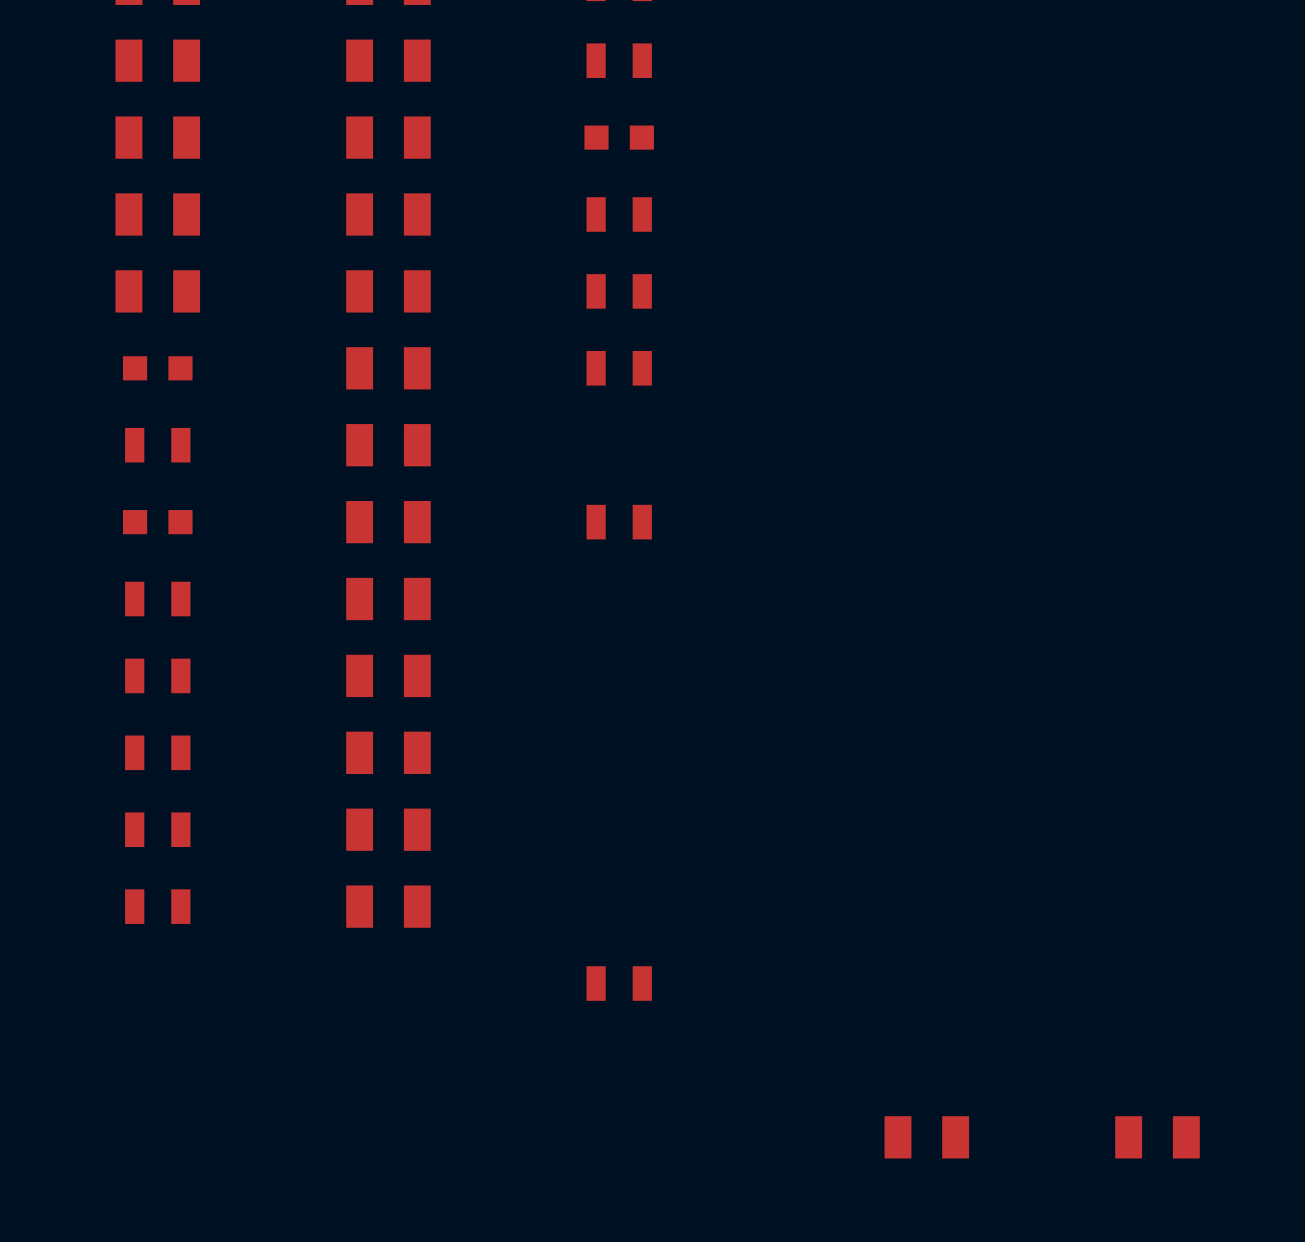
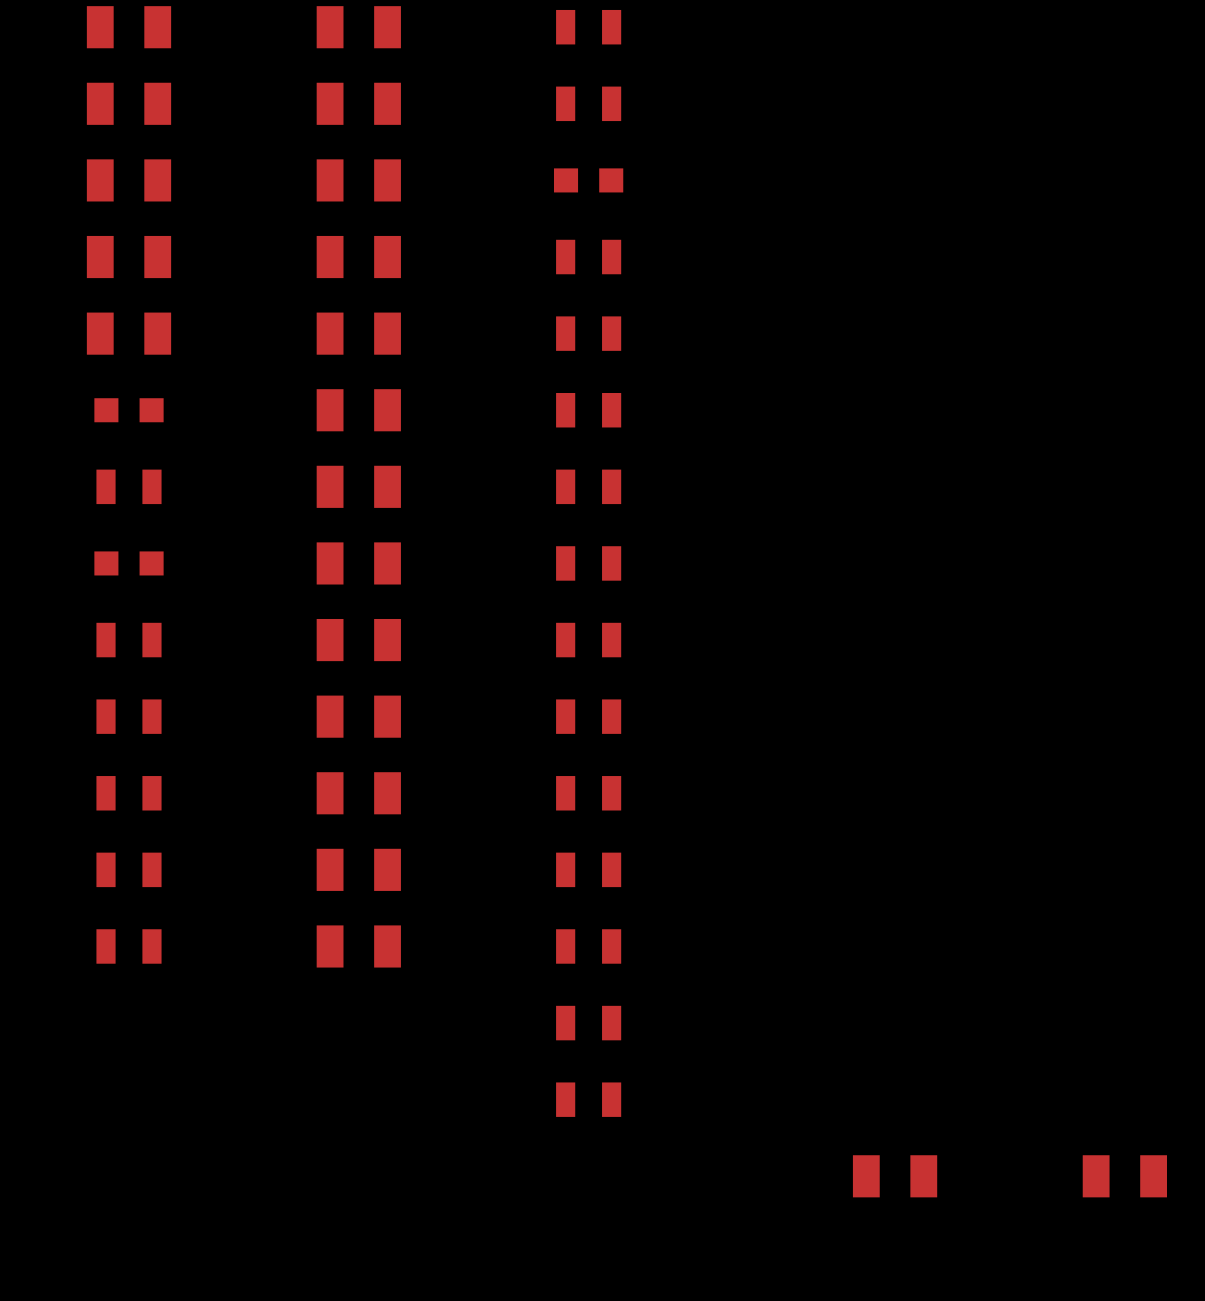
part: none -> (588, 486)
part: none -> (588, 640)
part: none -> (588, 716)
part: none -> (588, 793)
part: none -> (588, 869)
part: none -> (588, 946)
part: none -> (588, 1099)

